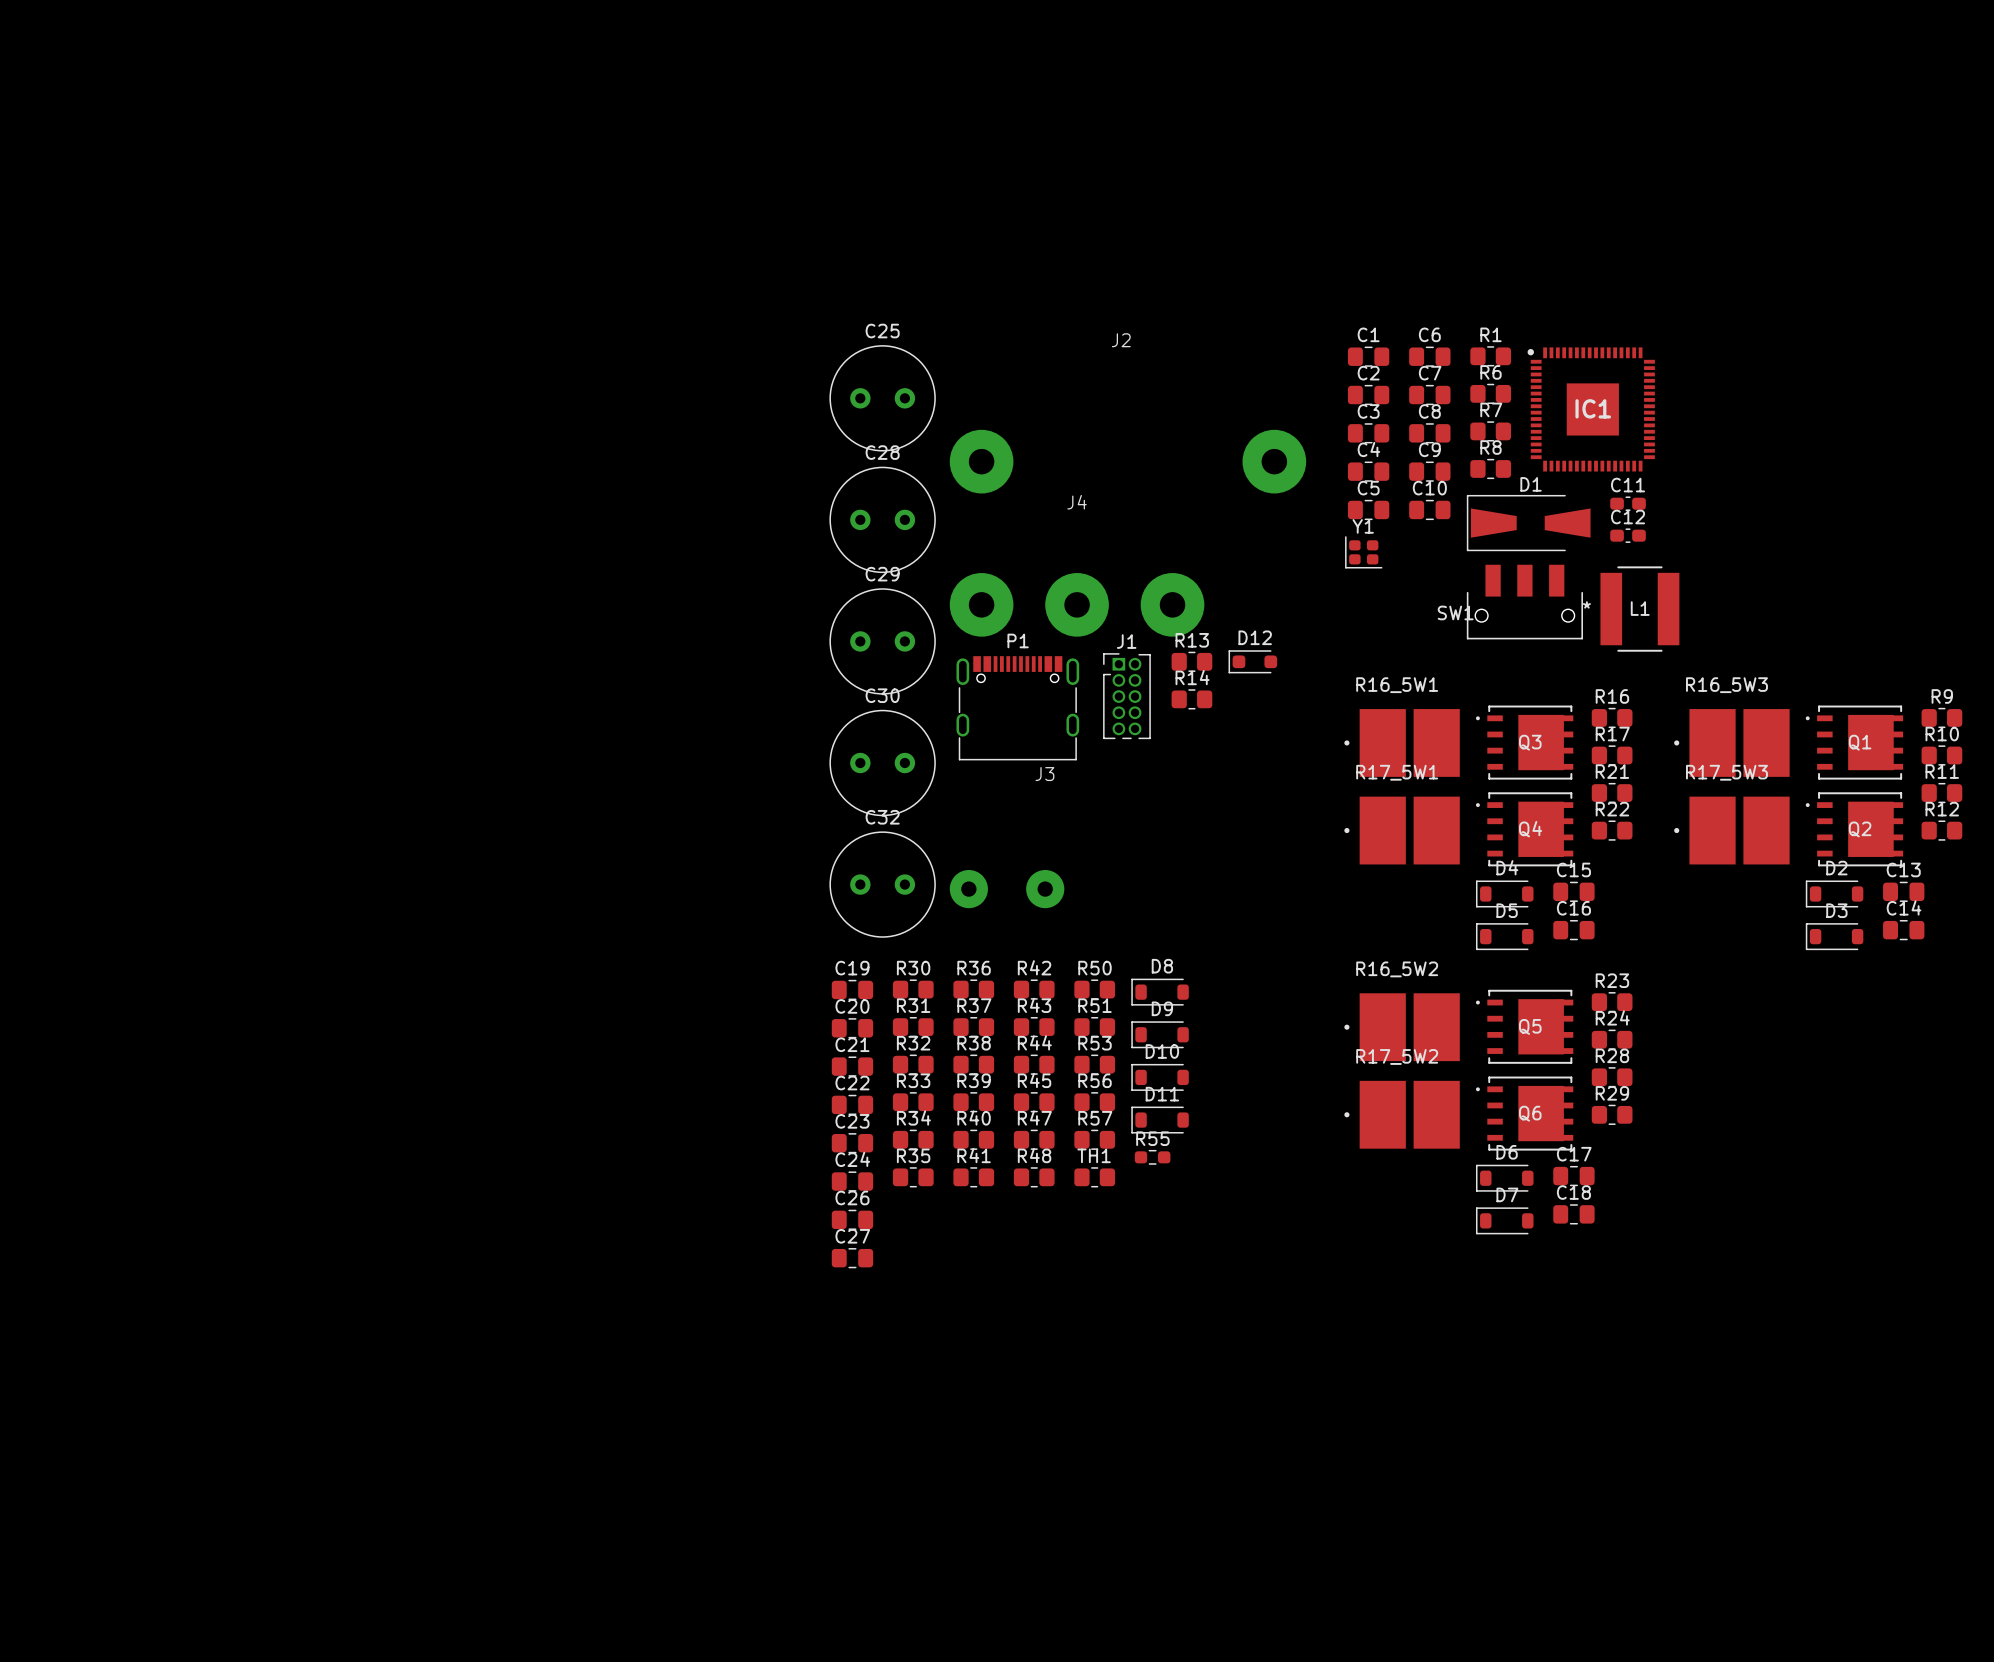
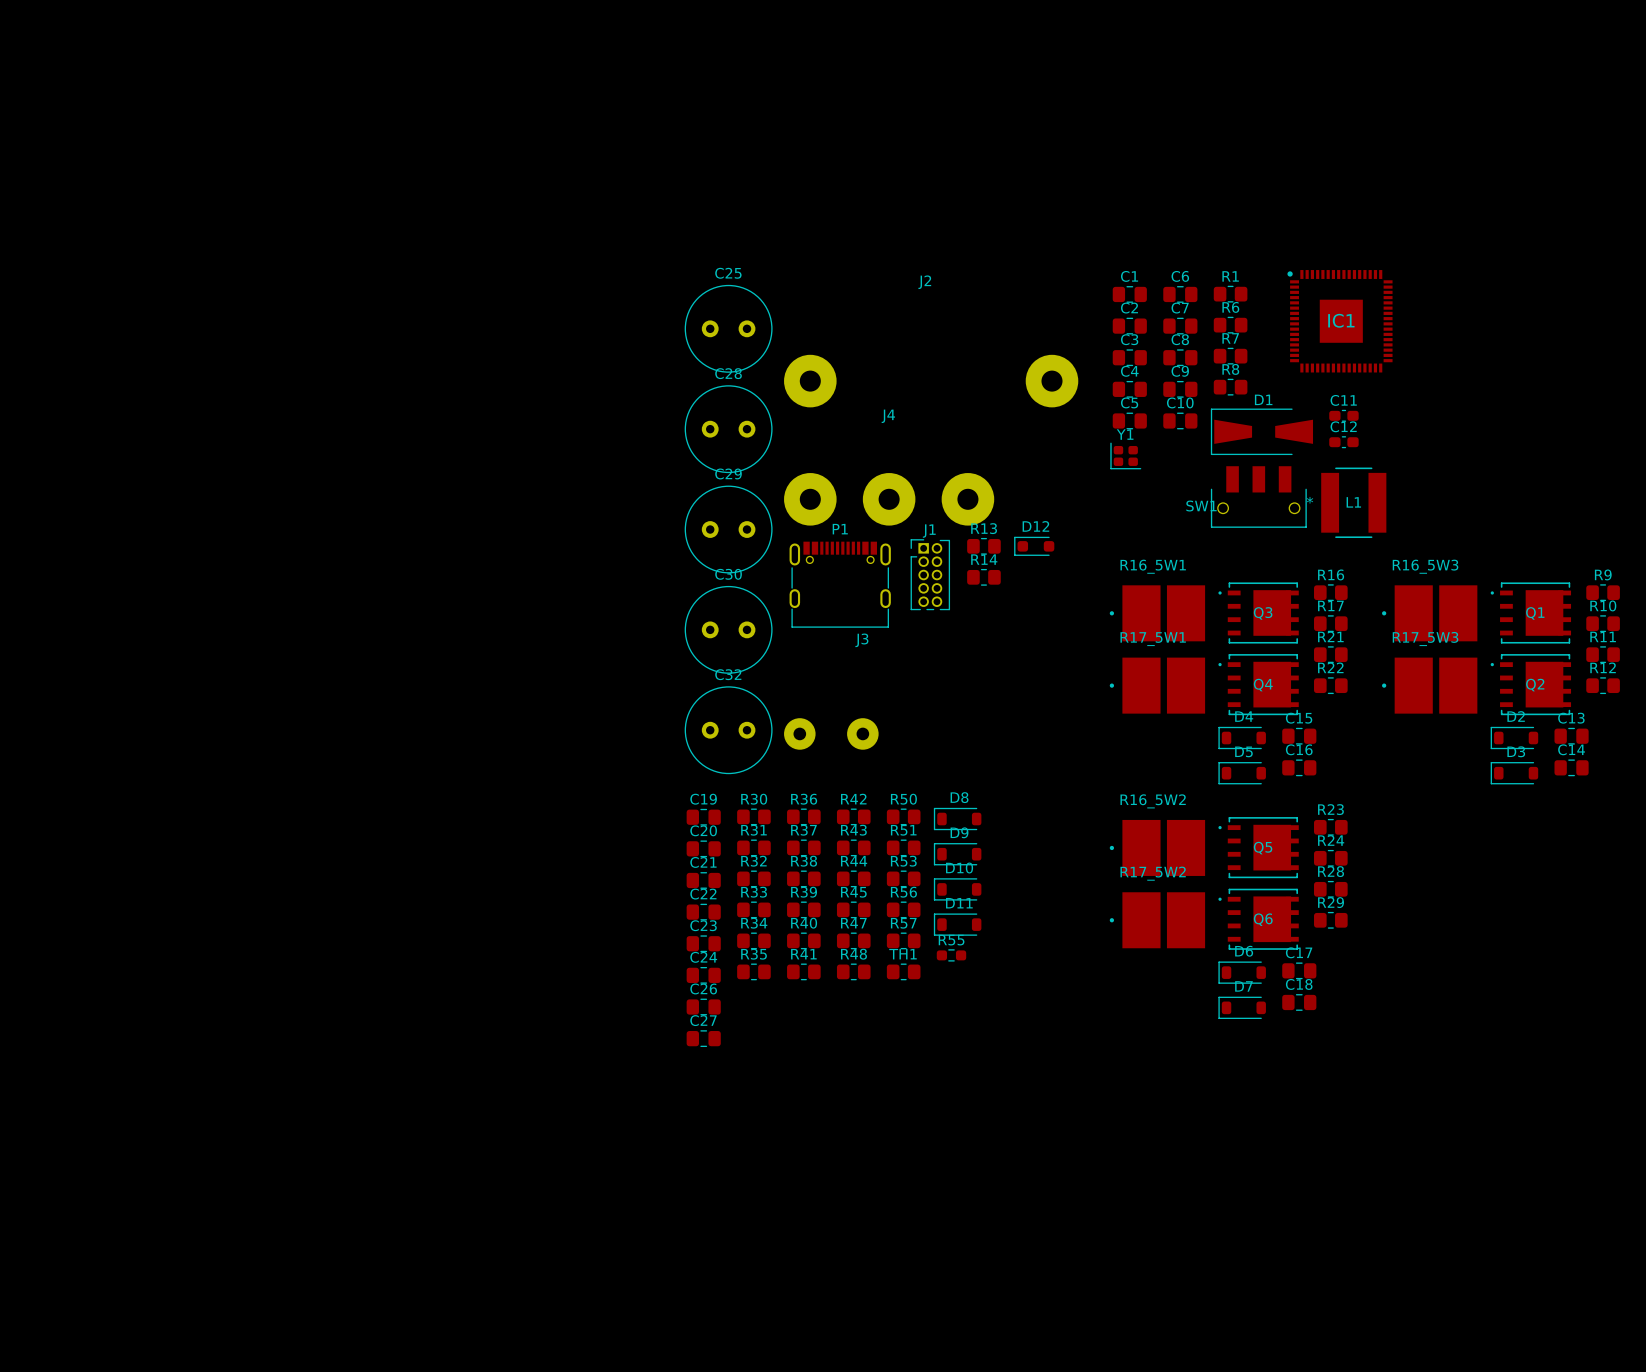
IC1 position: (1591, 409) -> (1339, 321)

